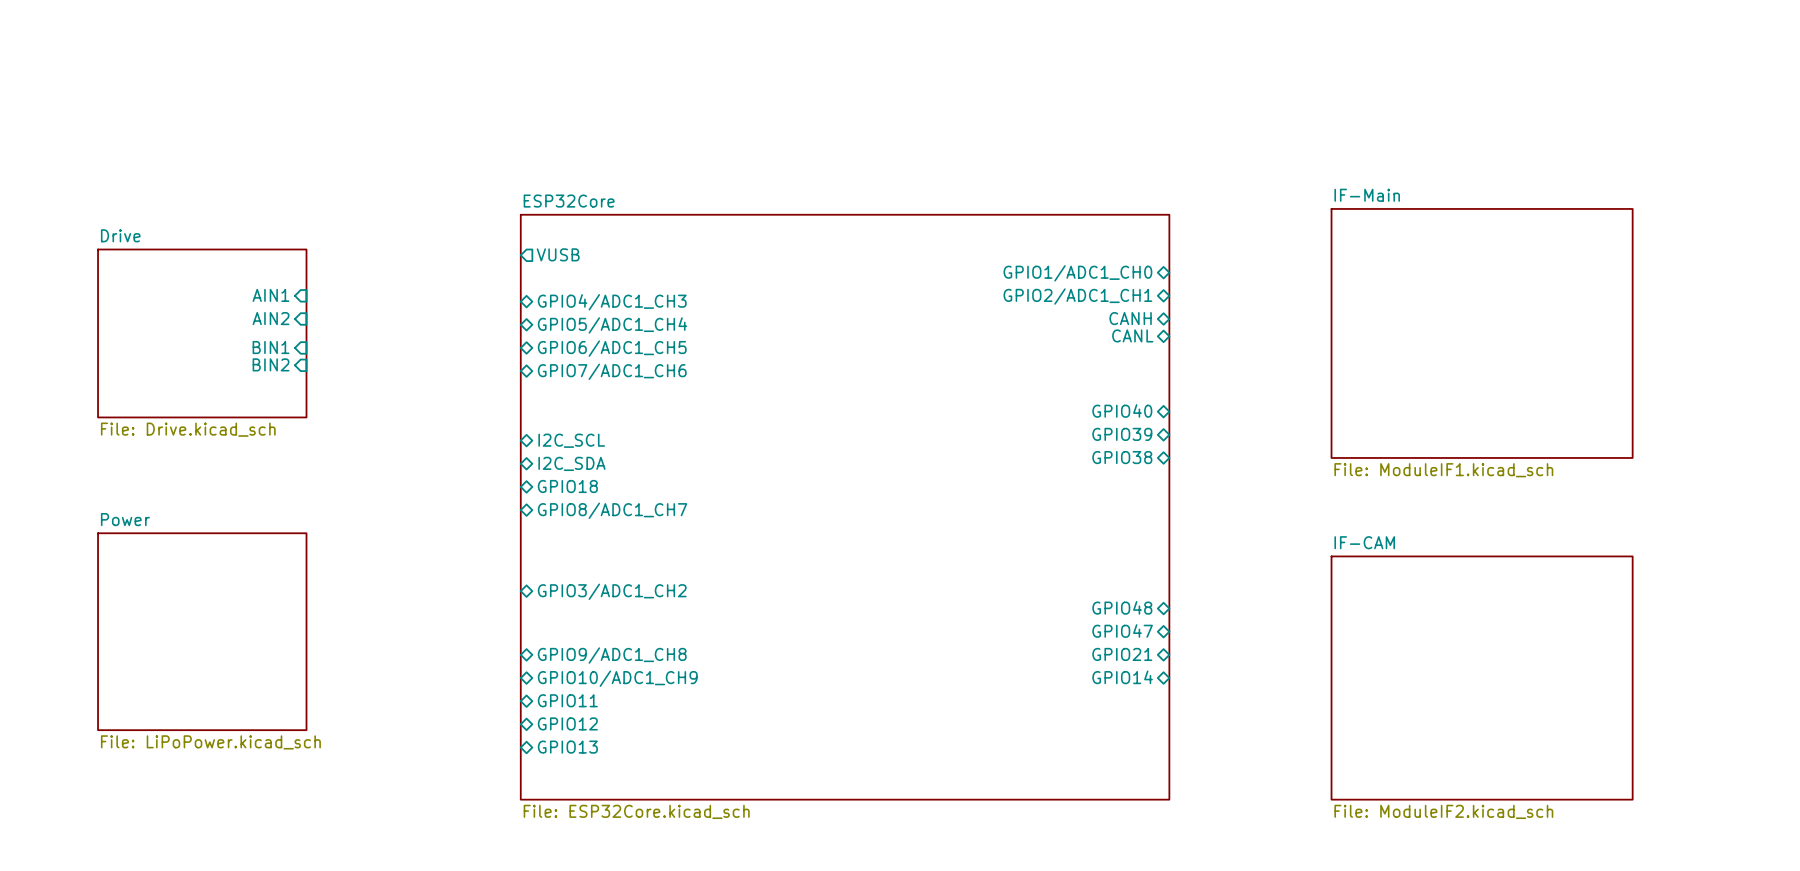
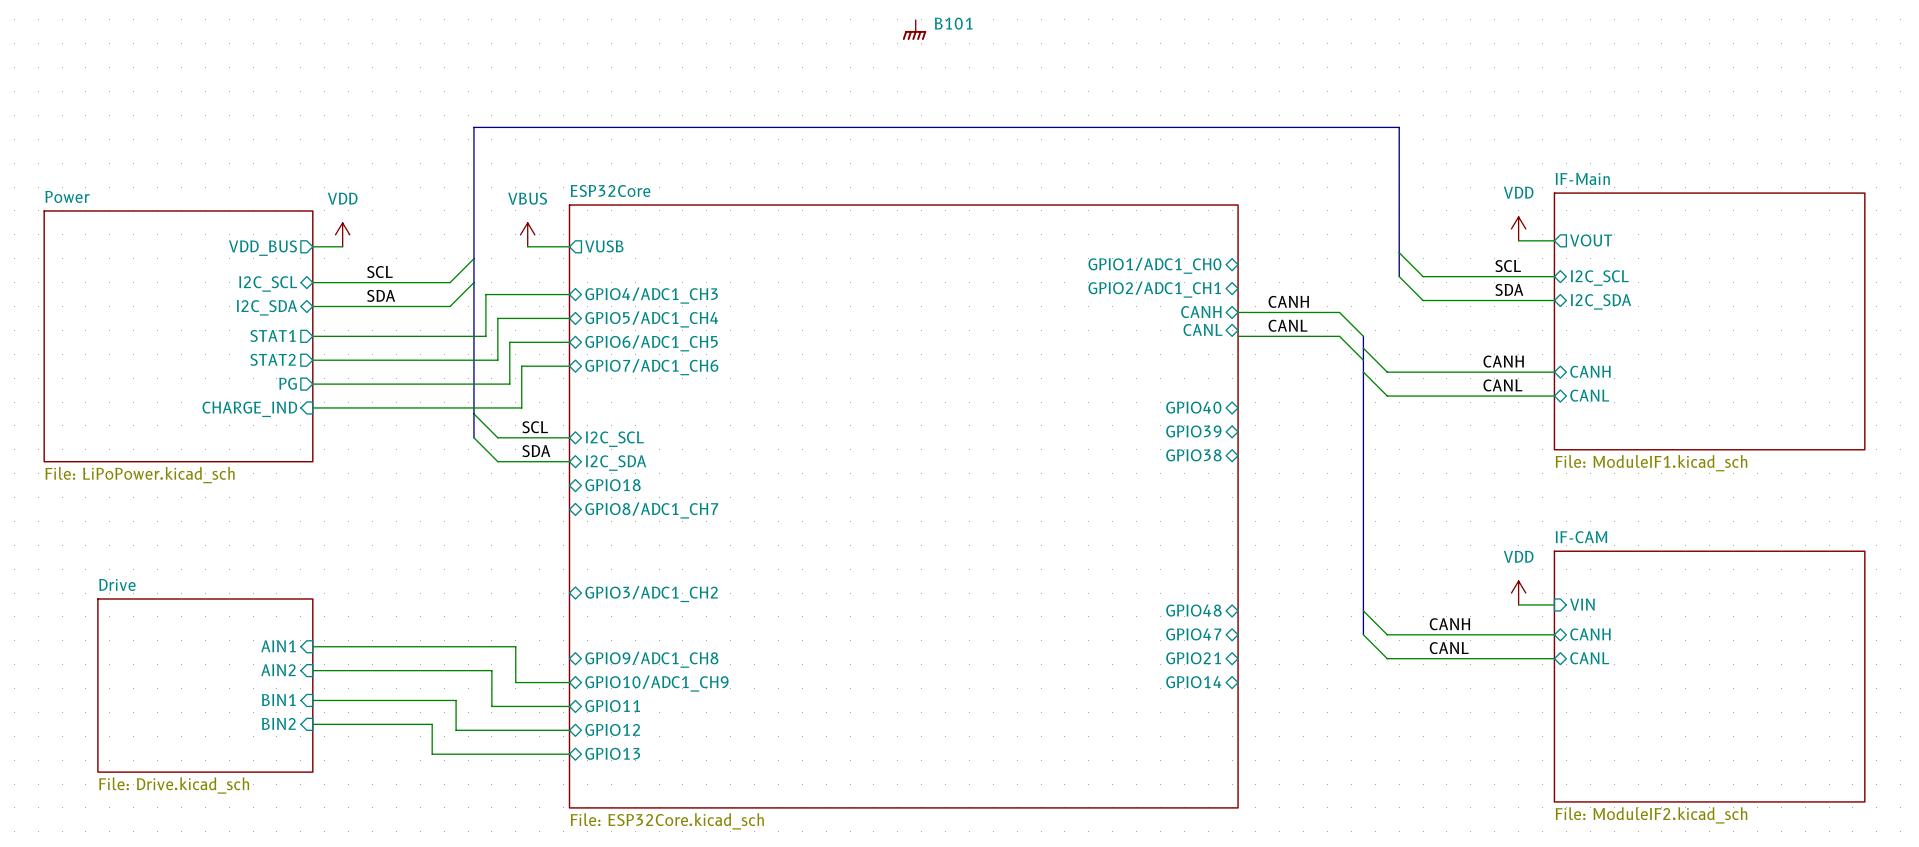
B101: none -> (914, 29)
power symbol: none -> VDD (1518, 228)
power symbol: none -> VDD (342, 234)
power symbol: none -> VBUS (527, 234)
wire: none -> (1518, 240) (1554, 240)
sheet pin: none -> VOUT (1591, 240)
sheet pin: none -> VDD_BUS (262, 248)
wire: none -> (312, 246) (342, 246)
wire: none -> (527, 246) (569, 246)
wire: none -> (1399, 252) (1423, 276) (1554, 276)
wire: none -> (473, 258) (450, 282) (312, 282)
label: none -> SCL (1508, 266)
label: none -> SCL (379, 272)
wire: none -> (1399, 276) (1423, 300) (1554, 300)
bus: none -> (1399, 276) (1399, 127) (473, 127) (473, 437)
sheet pin: none -> I2C_SCL (1599, 277)
sheet pin: none -> I2C_SCL (268, 283)
wire: none -> (473, 282) (450, 306) (312, 306)
sheet pin: AIN1 (271, 295) -> none
label: none -> SDA (1509, 289)
wire: none -> (569, 294) (485, 294) (485, 336) (312, 336)
label: none -> SDA (381, 295)
sheet pin: none -> I2C_SDA (1600, 301)
label: none -> CANH (1288, 301)
sheet pin: none -> I2C_SDA (266, 307)
sheet pin: AIN2 (271, 318) -> none
wire: none -> (1238, 312) (1339, 312) (1363, 336)
wire: none -> (569, 318) (497, 318) (497, 360) (312, 360)
label: none -> CANL (1288, 325)
sheet Drive: File: Drive.kicad_sch (202, 333) -> none
sheet IF-Main position: (1482, 333) -> (1709, 321)
sheet pin: none -> STAT1 (273, 335)
sheet Power: none -> File: LiPoPower.kicad_sch (178, 336)
wire: none -> (1238, 336) (1339, 336) (1363, 360)
bus: none -> (1363, 336) (1363, 634)
sheet pin: BIN1 (271, 347) -> none
wire: none -> (569, 342) (509, 342) (509, 384) (312, 384)
wire: none -> (1363, 348) (1387, 372)
sheet pin: none -> STAT2 (273, 359)
sheet pin: BIN2 (271, 364) -> none
label: none -> CANH (1503, 361)
wire: none -> (569, 366) (521, 366) (521, 407) (312, 407)
wire: none -> (1363, 372) (1387, 396) (1554, 396)
wire: none -> (1387, 372) (1554, 372)
sheet pin: none -> CANH (1590, 371)
sheet pin: none -> PG (288, 383)
label: none -> CANL (1502, 385)
sheet pin: none -> CANL (1589, 395)
sheet pin: none -> CHARGE_IND (249, 409)
wire: none -> (473, 413) (497, 437)
label: none -> SCL (535, 427)
wire: none -> (473, 437) (497, 461)
wire: none -> (497, 437) (569, 437)
label: none -> SDA (536, 451)
wire: none -> (497, 461) (569, 461)
power symbol: none -> VDD (1518, 593)
wire: none -> (1518, 604) (1554, 604)
sheet pin: none -> VIN (1582, 604)
wire: none -> (1363, 610) (1387, 634)
label: none -> CANH (1449, 624)
sheet Power: File: LiPoPower.kicad_sch (202, 631) -> none
wire: none -> (1363, 634) (1387, 658) (1554, 658)
wire: none -> (1387, 634) (1554, 634)
sheet pin: none -> CANH (1590, 634)
sheet pin: none -> AIN1 (278, 646)
wire: none -> (312, 646) (515, 646) (515, 682) (569, 682)
label: none -> CANL (1449, 648)
sheet pin: none -> CANL (1589, 658)
sheet pin: none -> AIN2 (278, 670)
wire: none -> (312, 670) (491, 670) (491, 706) (569, 706)
sheet IF-CAM position: (1482, 678) -> (1709, 676)
sheet Drive: none -> File: Drive.kicad_sch (205, 685)
sheet pin: none -> BIN1 (278, 700)
wire: none -> (312, 700) (456, 700) (456, 730) (569, 730)
sheet pin: none -> BIN2 (278, 723)
wire: none -> (312, 724) (432, 724) (432, 754) (569, 754)

